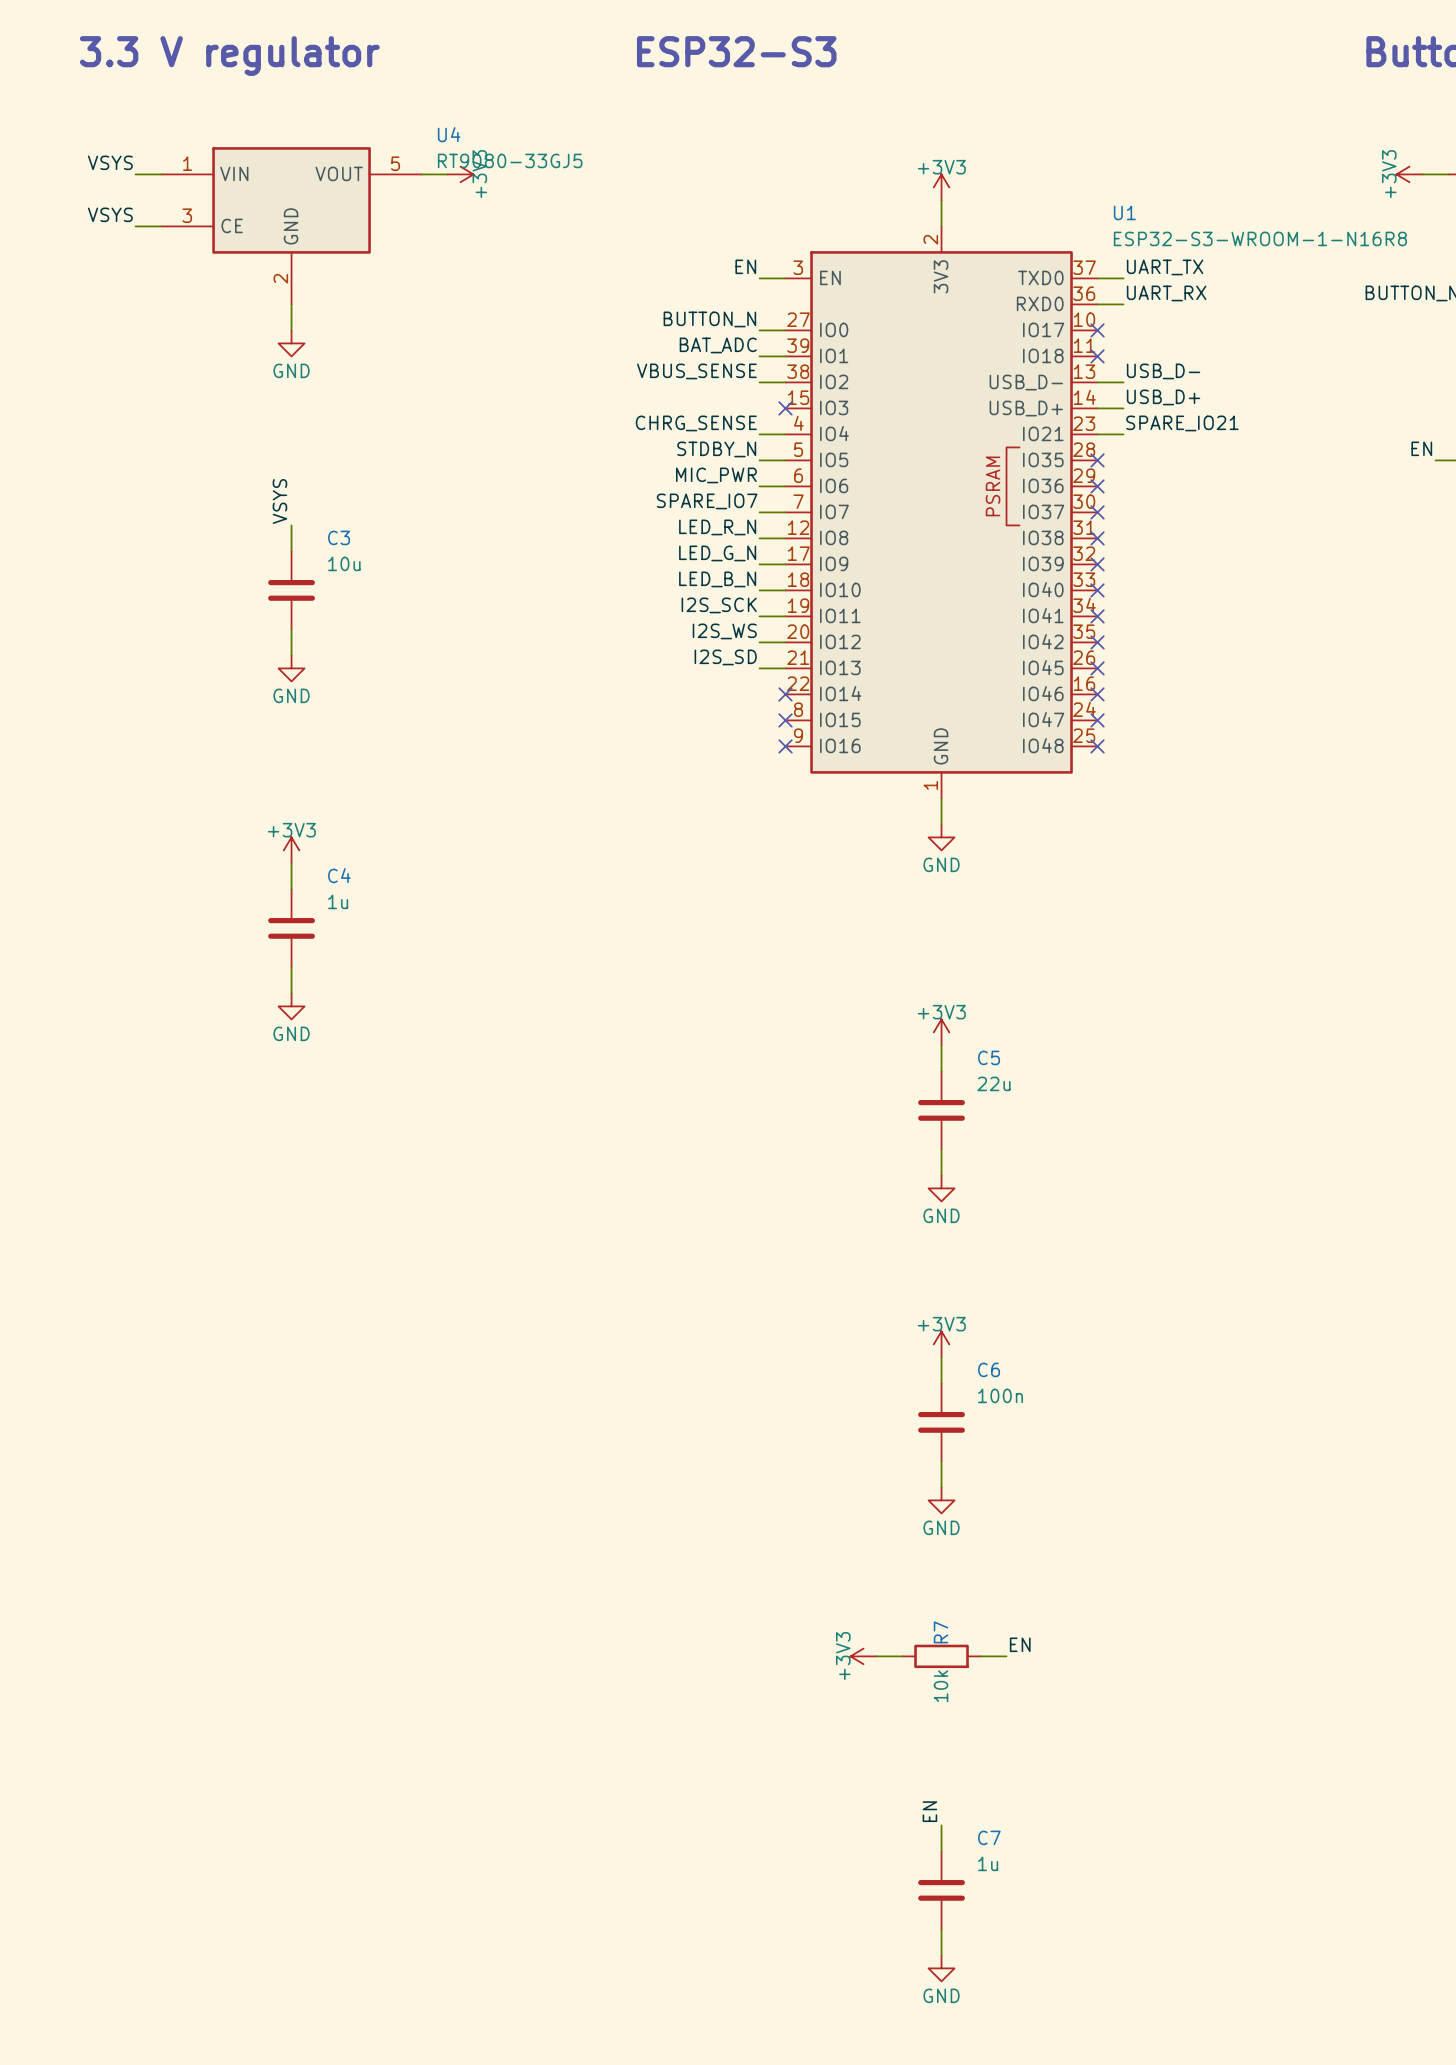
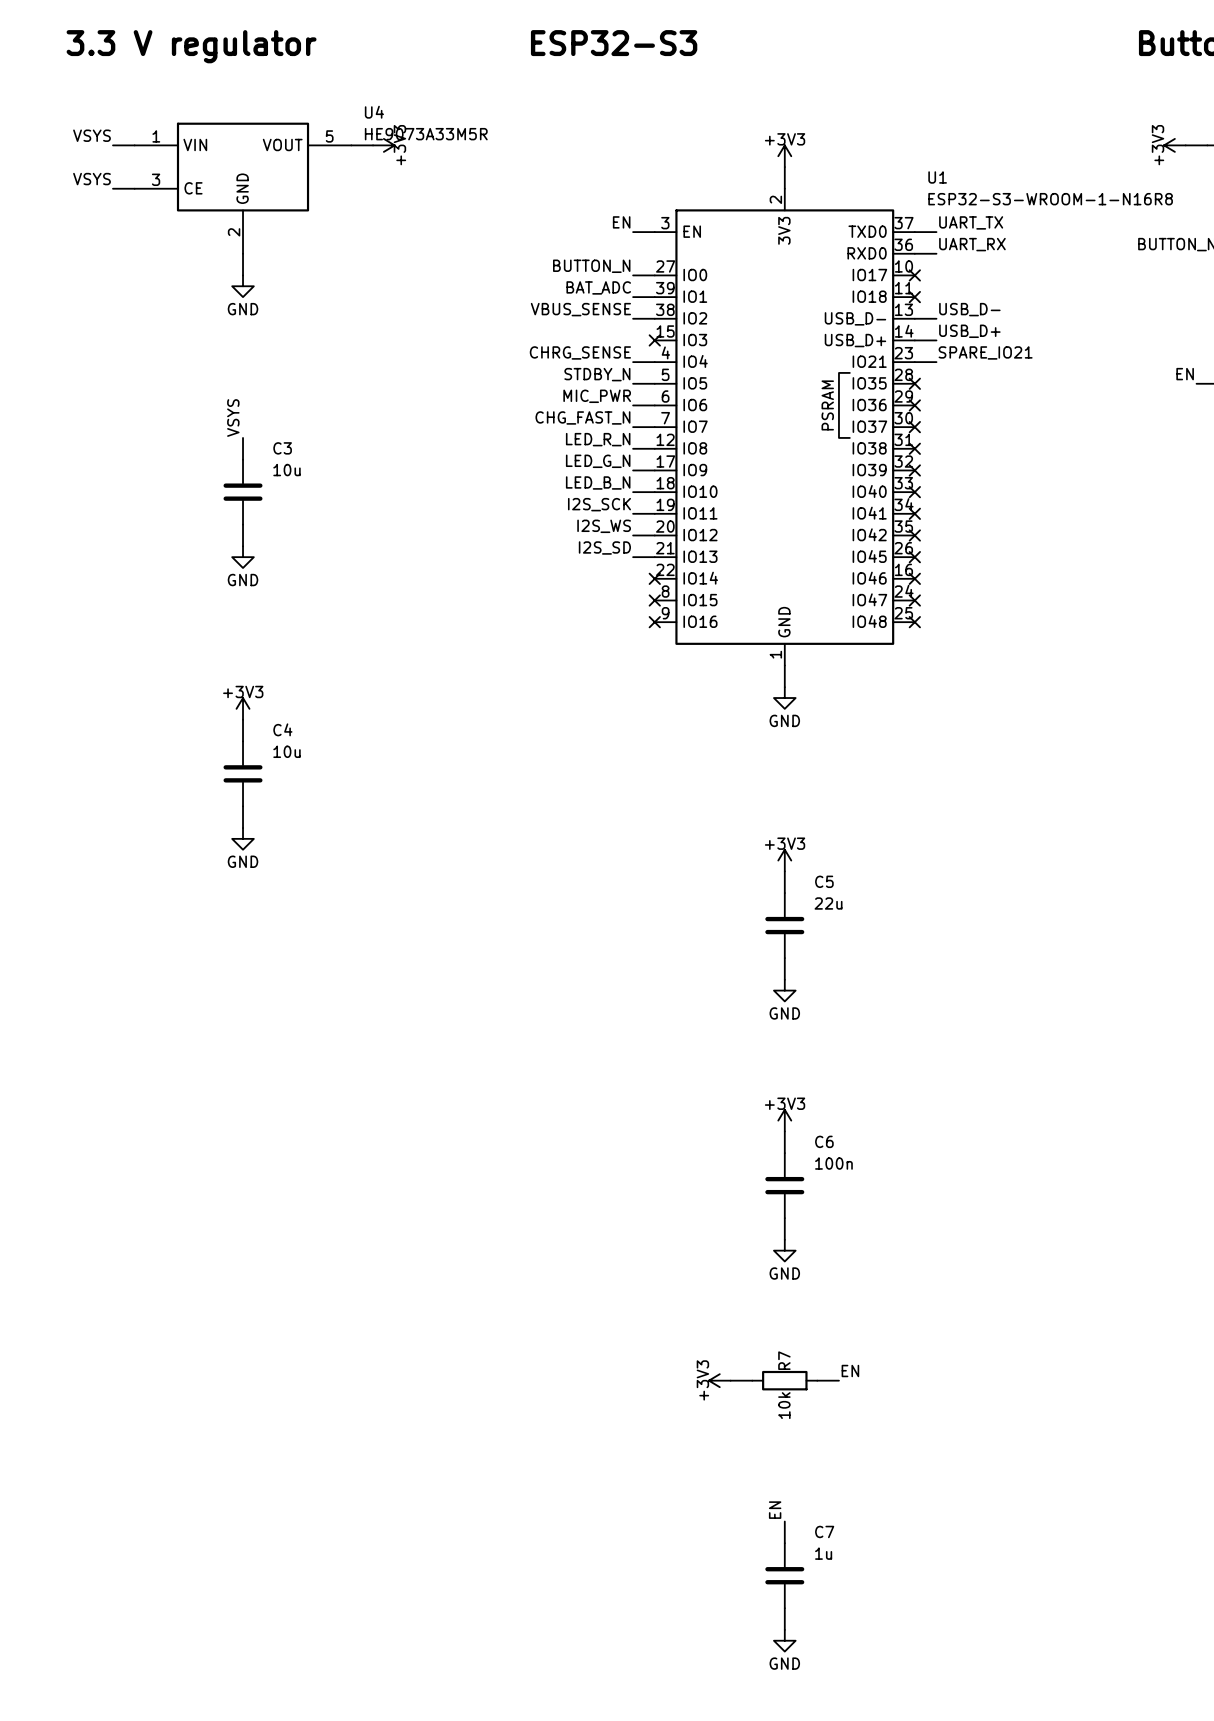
U4 value: RT9080-33GJ5 (510, 160) -> HE9073A33M5R (426, 134)
label: SPARE_IO7 (707, 501) -> CHG_FAST_N (582, 417)
C4 value: 1u (338, 901) -> 10u (287, 751)

